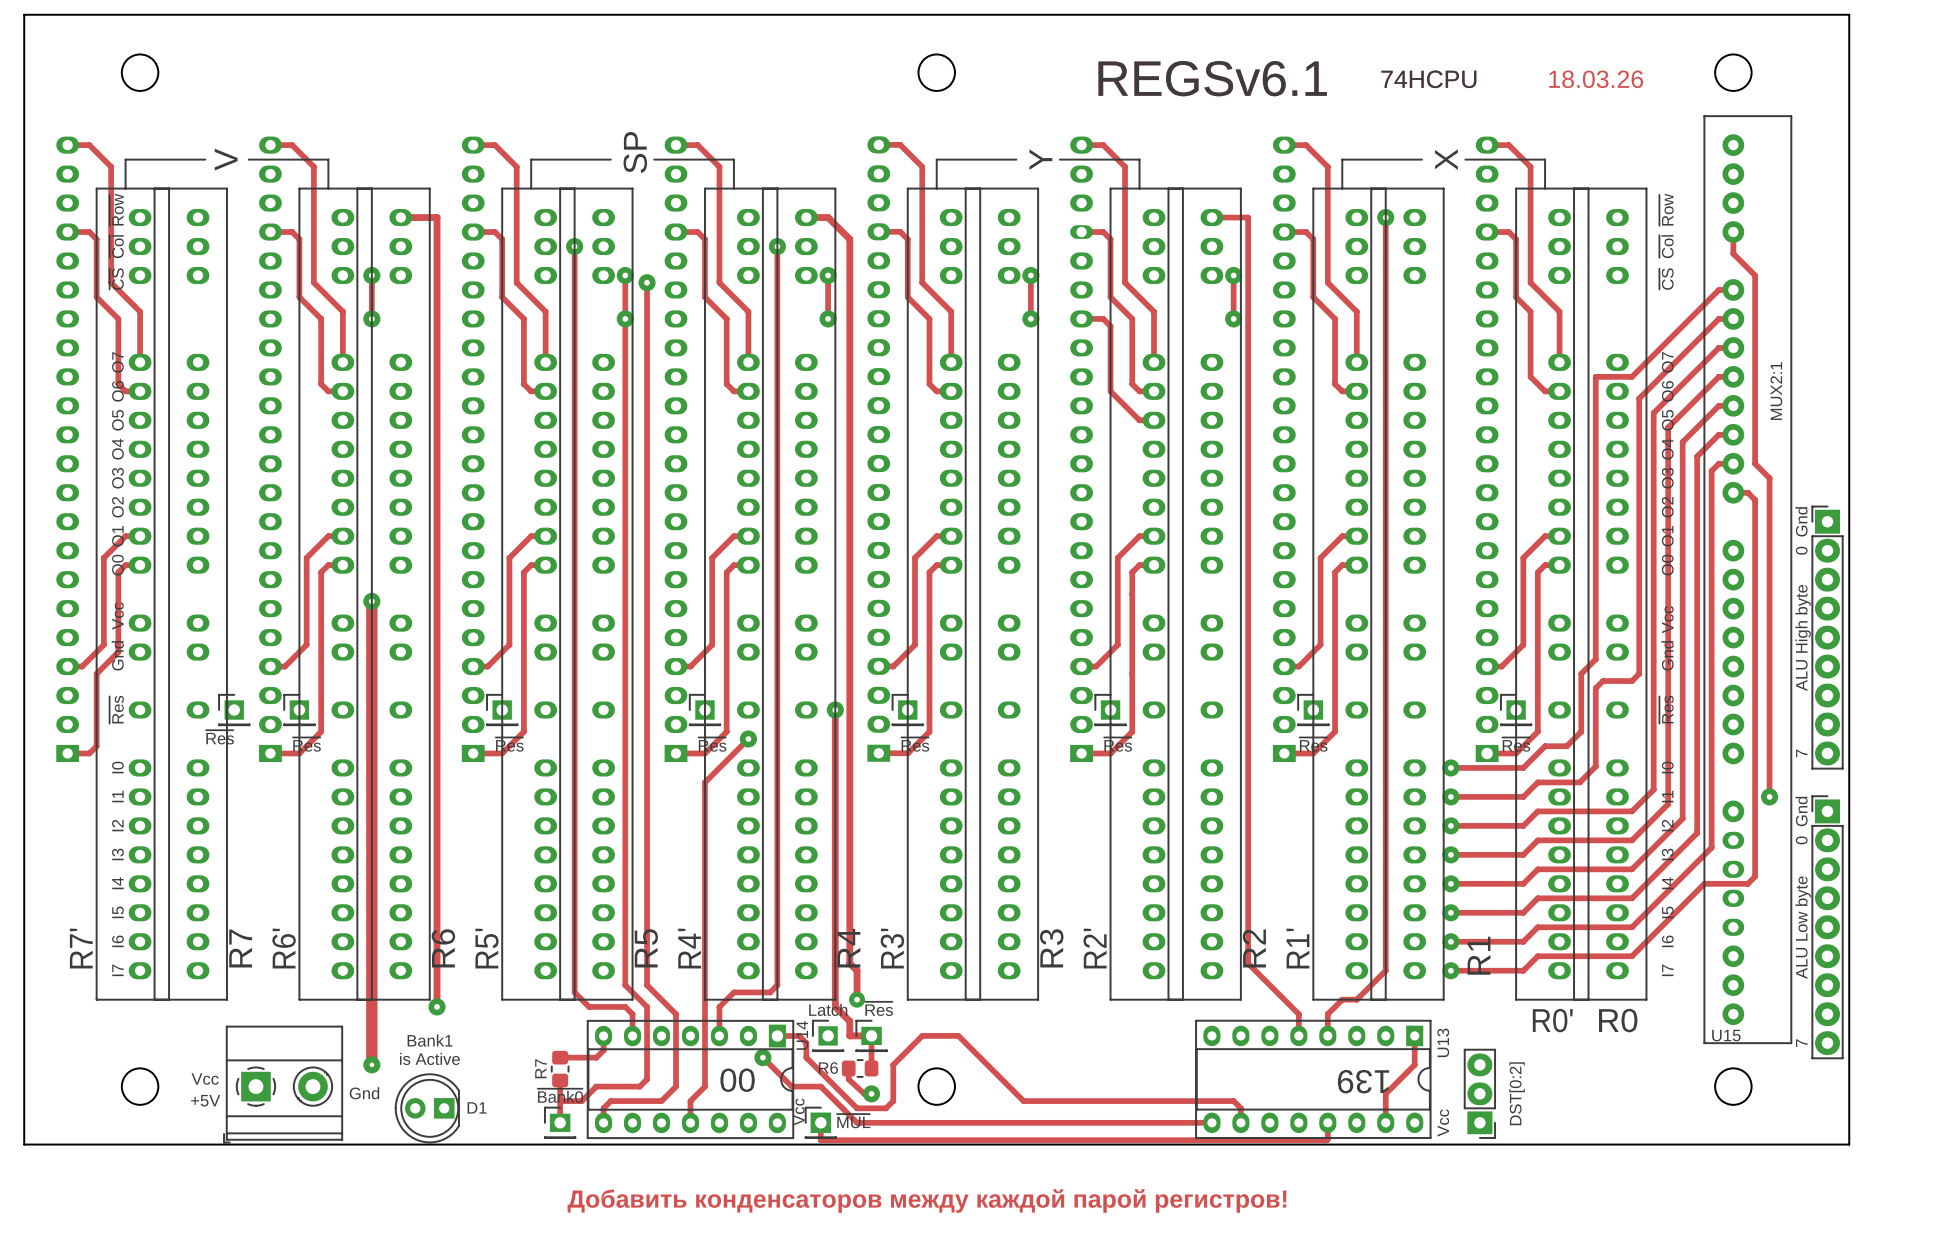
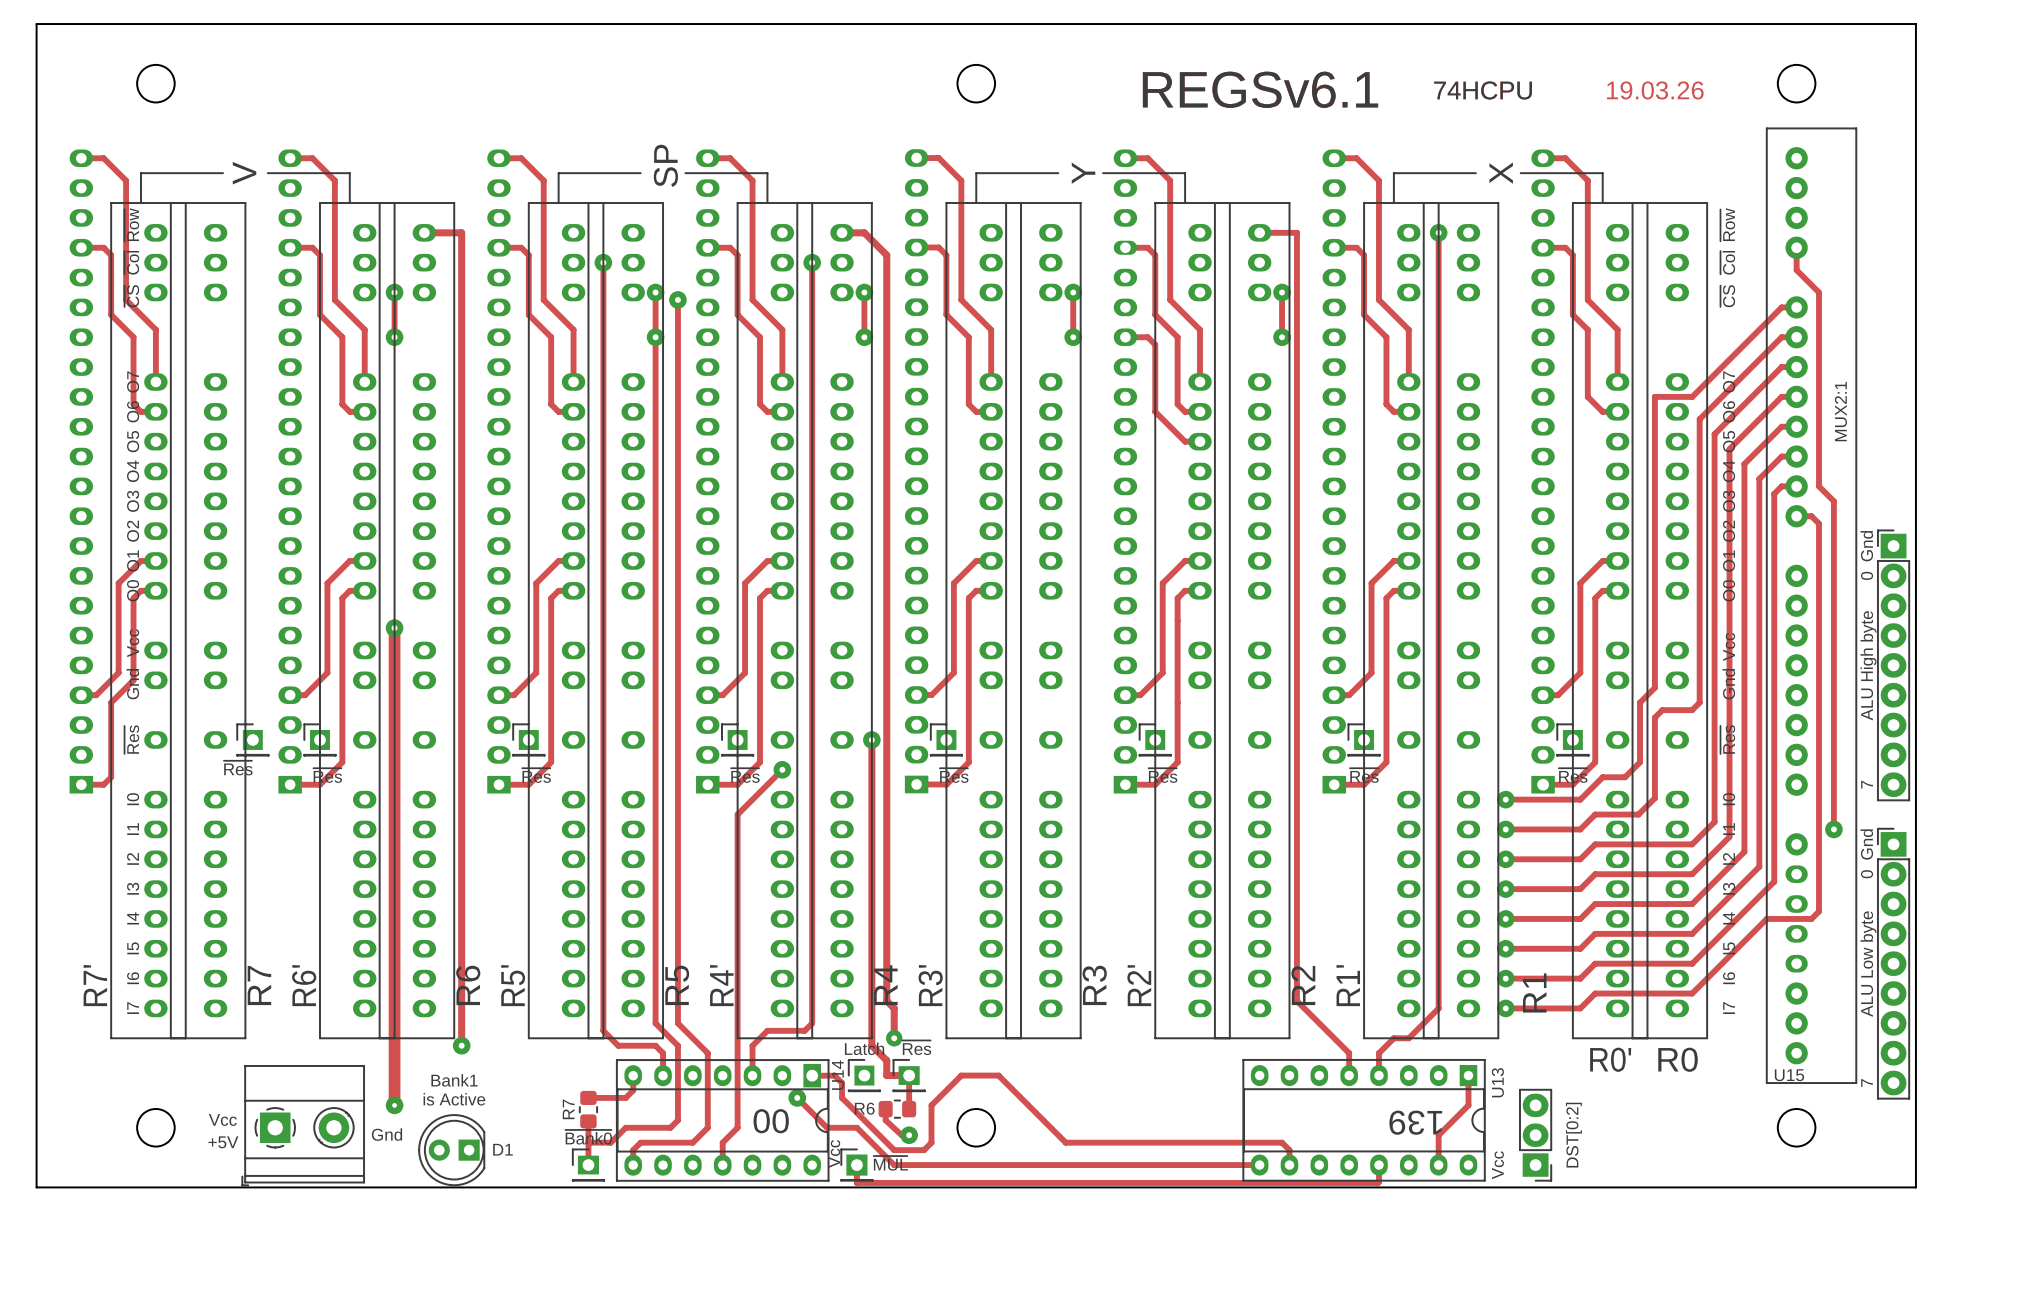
text: 18.03.26 (1596, 79) -> 19.03.26 (1655, 90)
text: Добавить конденсаторов между каждой парой регистров! (927, 1200) -> none

